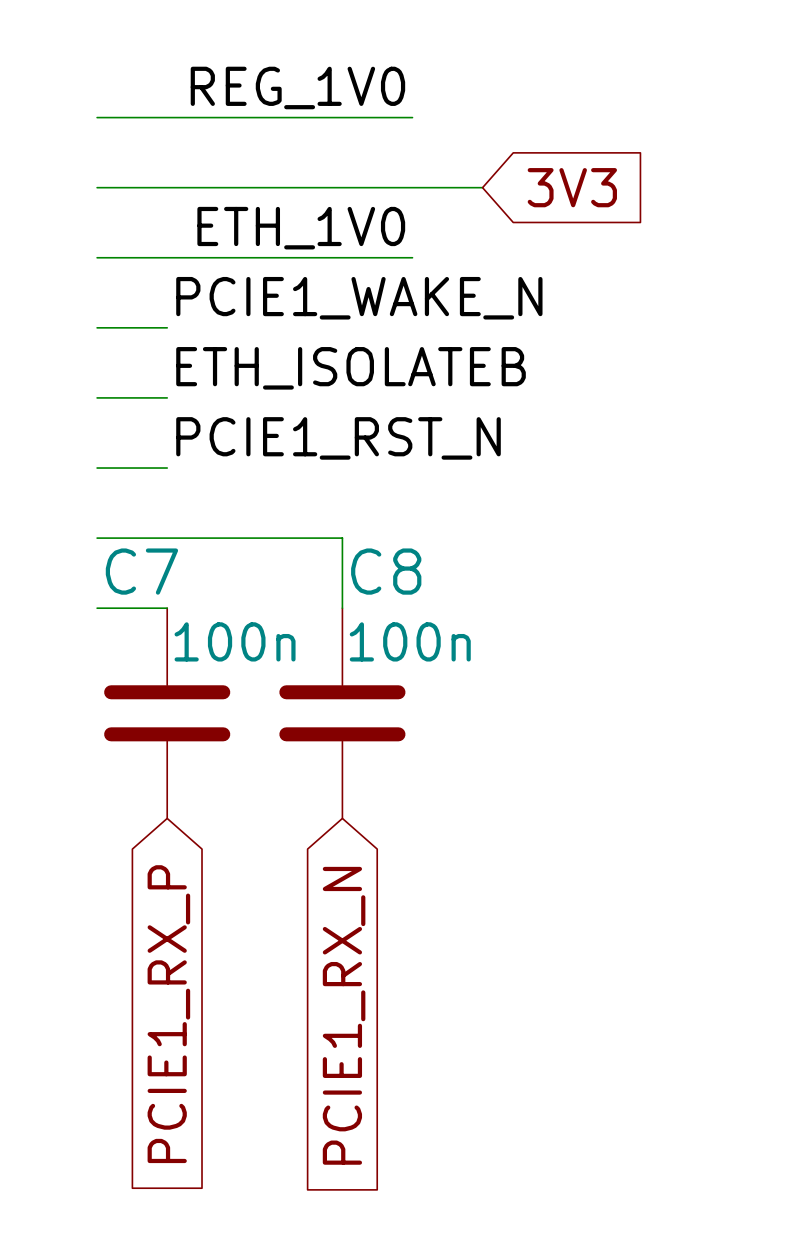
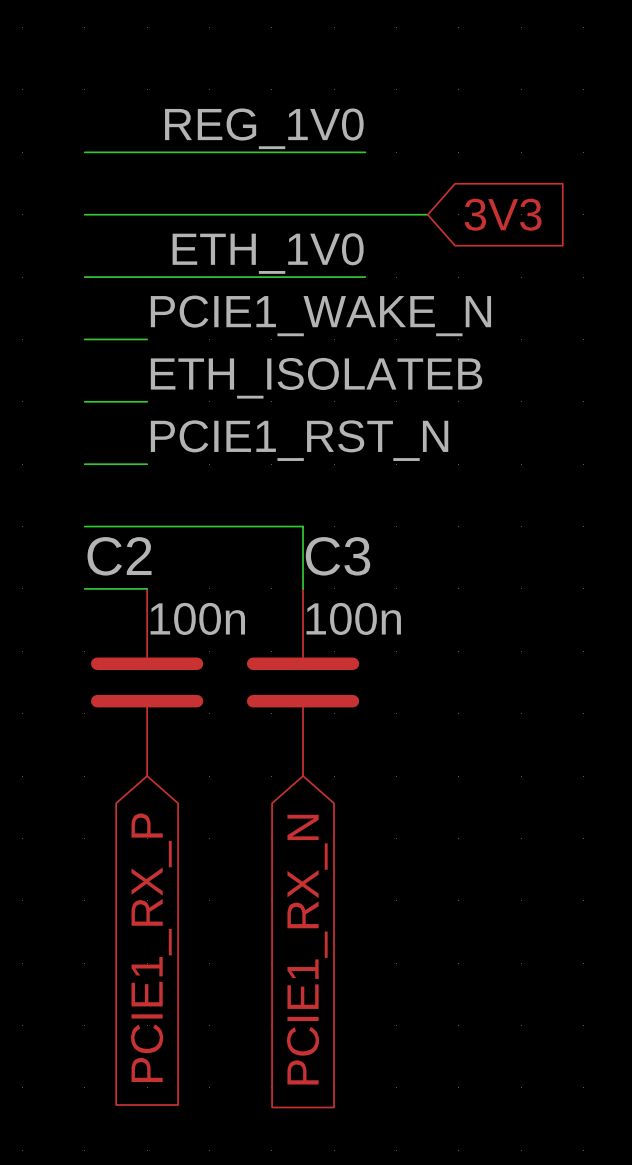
C7 name: C7 (141, 571) -> C2 (119, 556)
C8 name: C8 (386, 571) -> C3 (337, 556)

